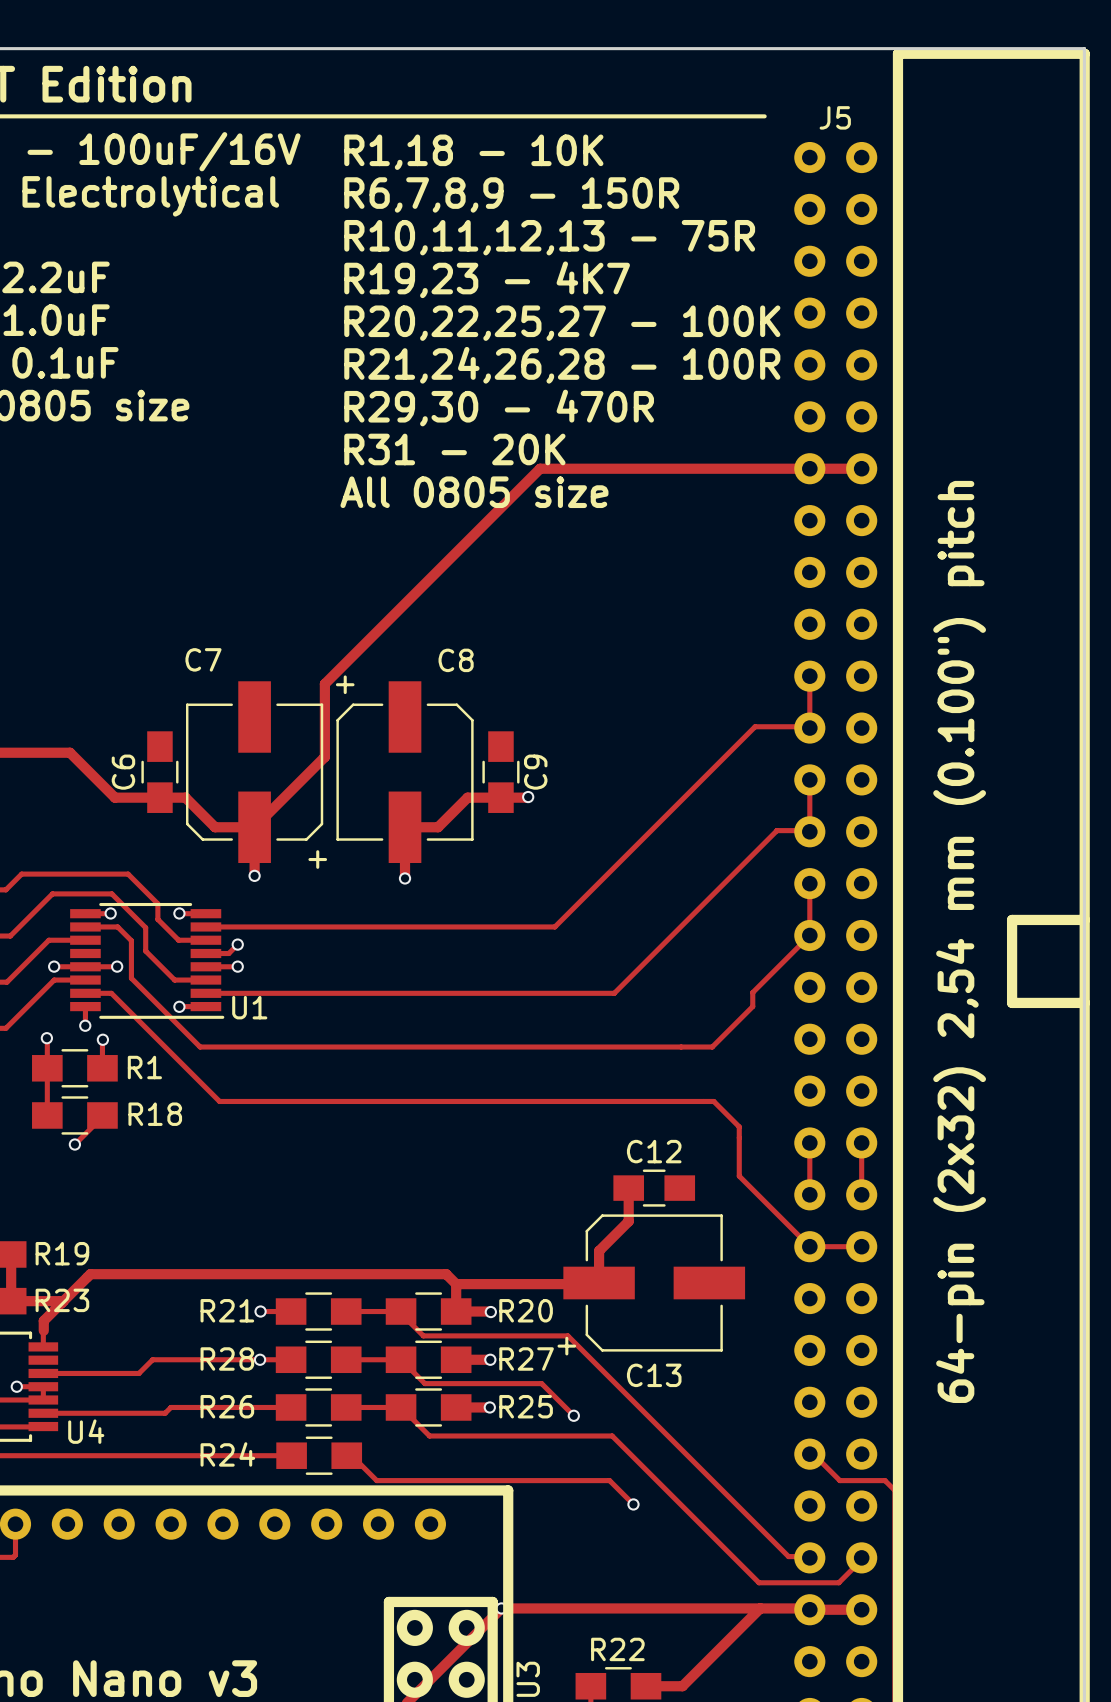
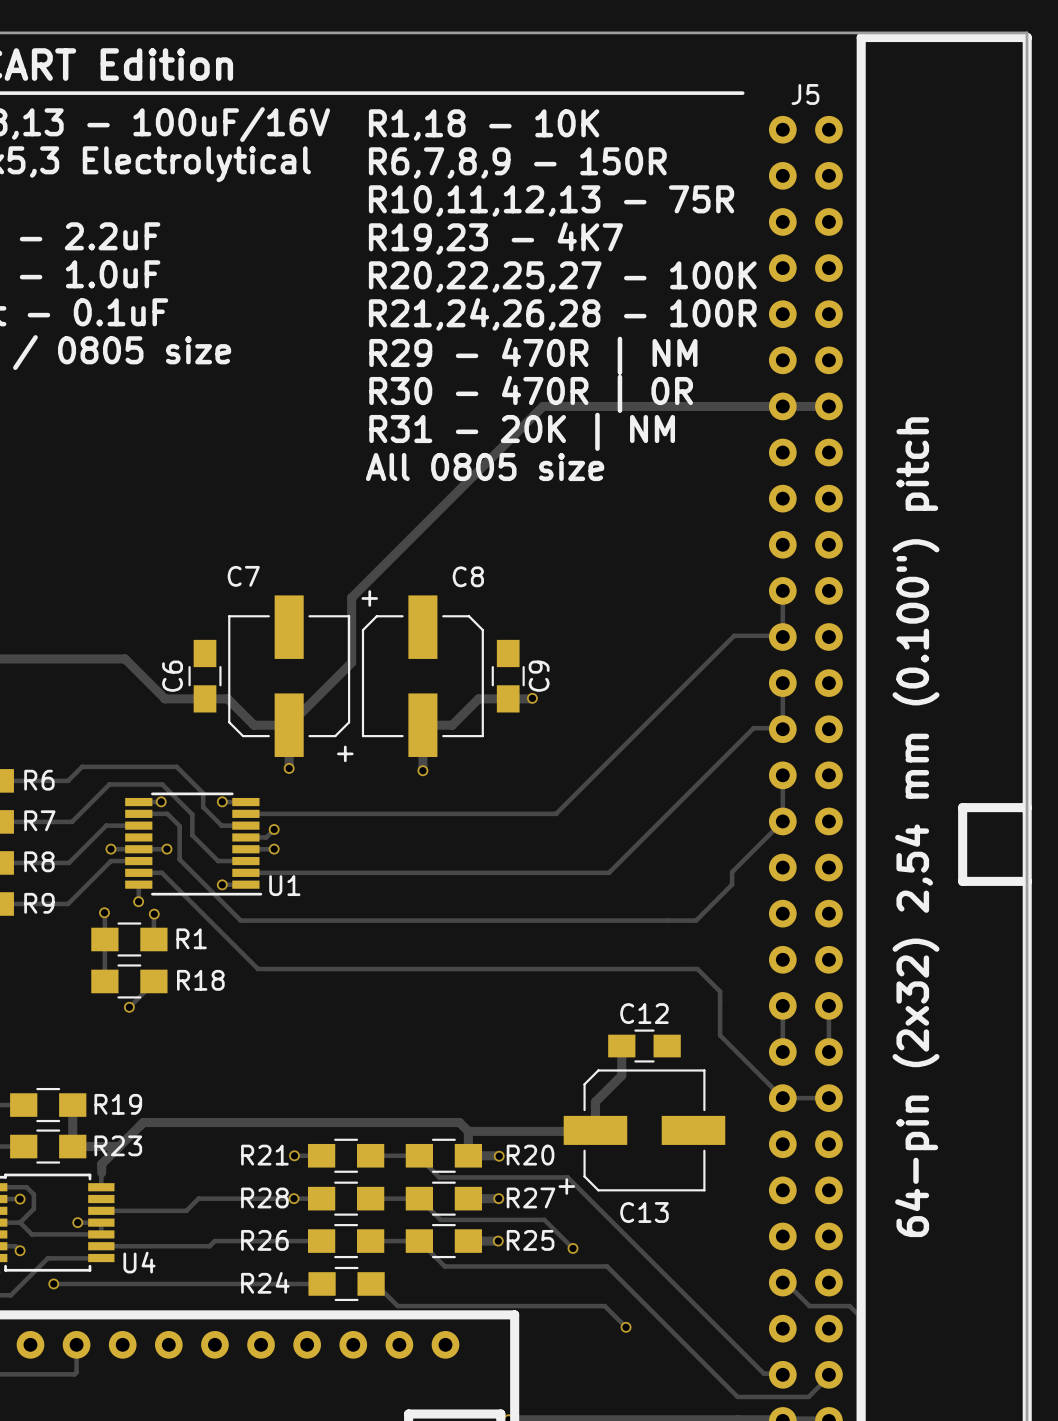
text: R29,30 - 470R (499, 408) -> R29 - 470R | NM (533, 355)
text: R31 - 20K (454, 449) -> R30 - 470R | 0R (531, 393)
text: All 0805 size (474, 492) -> R31 - 20K | NM (522, 431)
text: none -> All 0805 size (485, 467)

